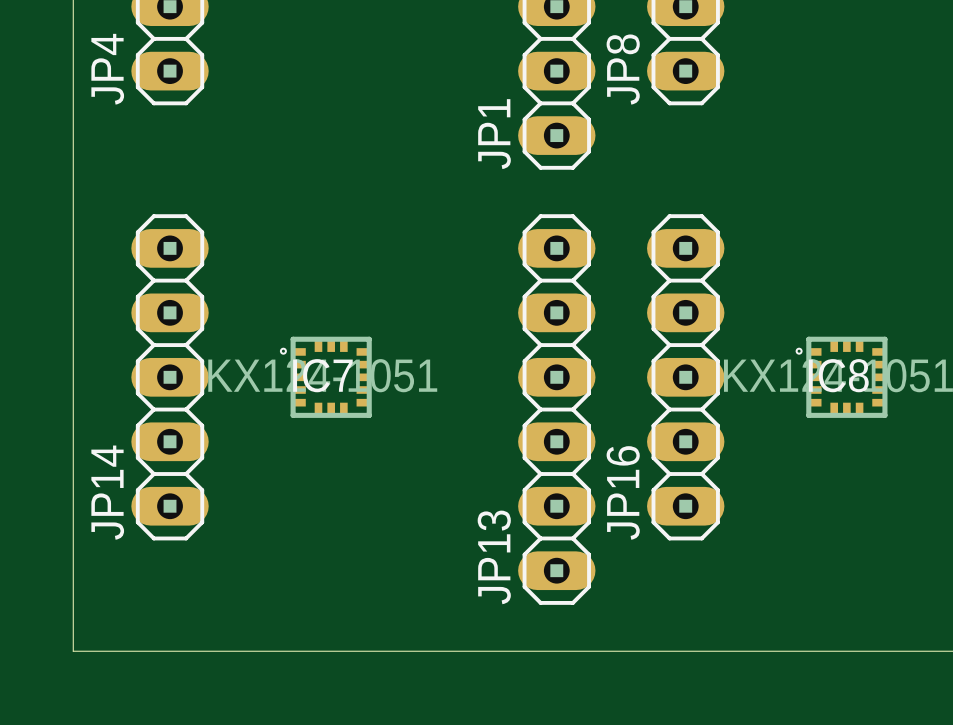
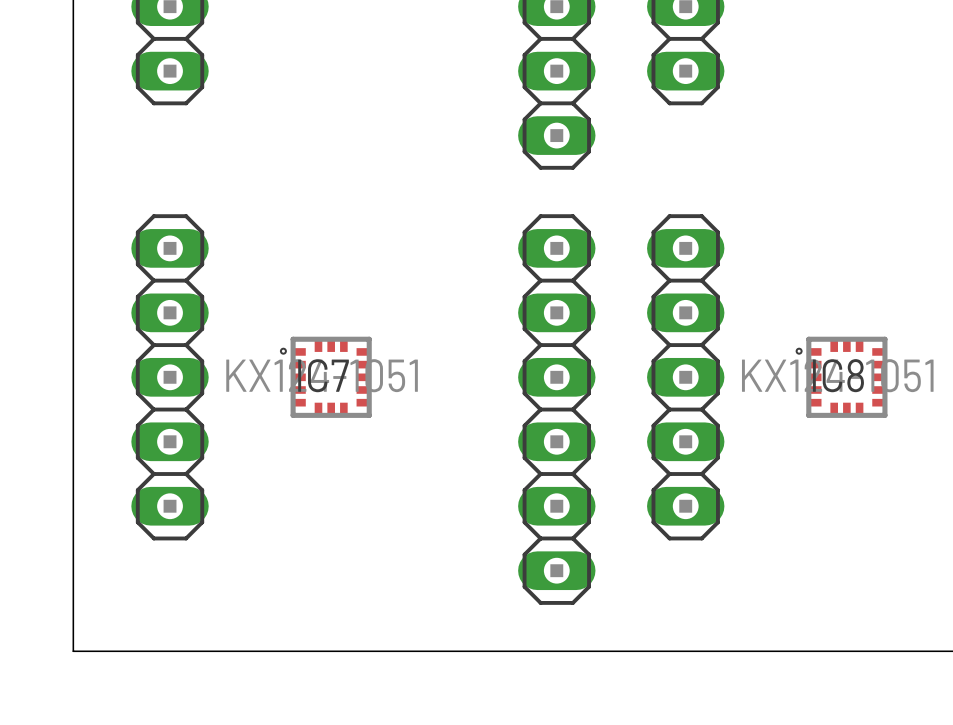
JP4 name: JP4 (107, 69) -> none
JP8 name: JP8 (623, 69) -> none
JP1 name: JP1 (494, 134) -> none
JP14 name: JP14 (107, 492) -> none
JP16 name: JP16 (623, 492) -> none
JP13 name: JP13 (494, 557) -> none

